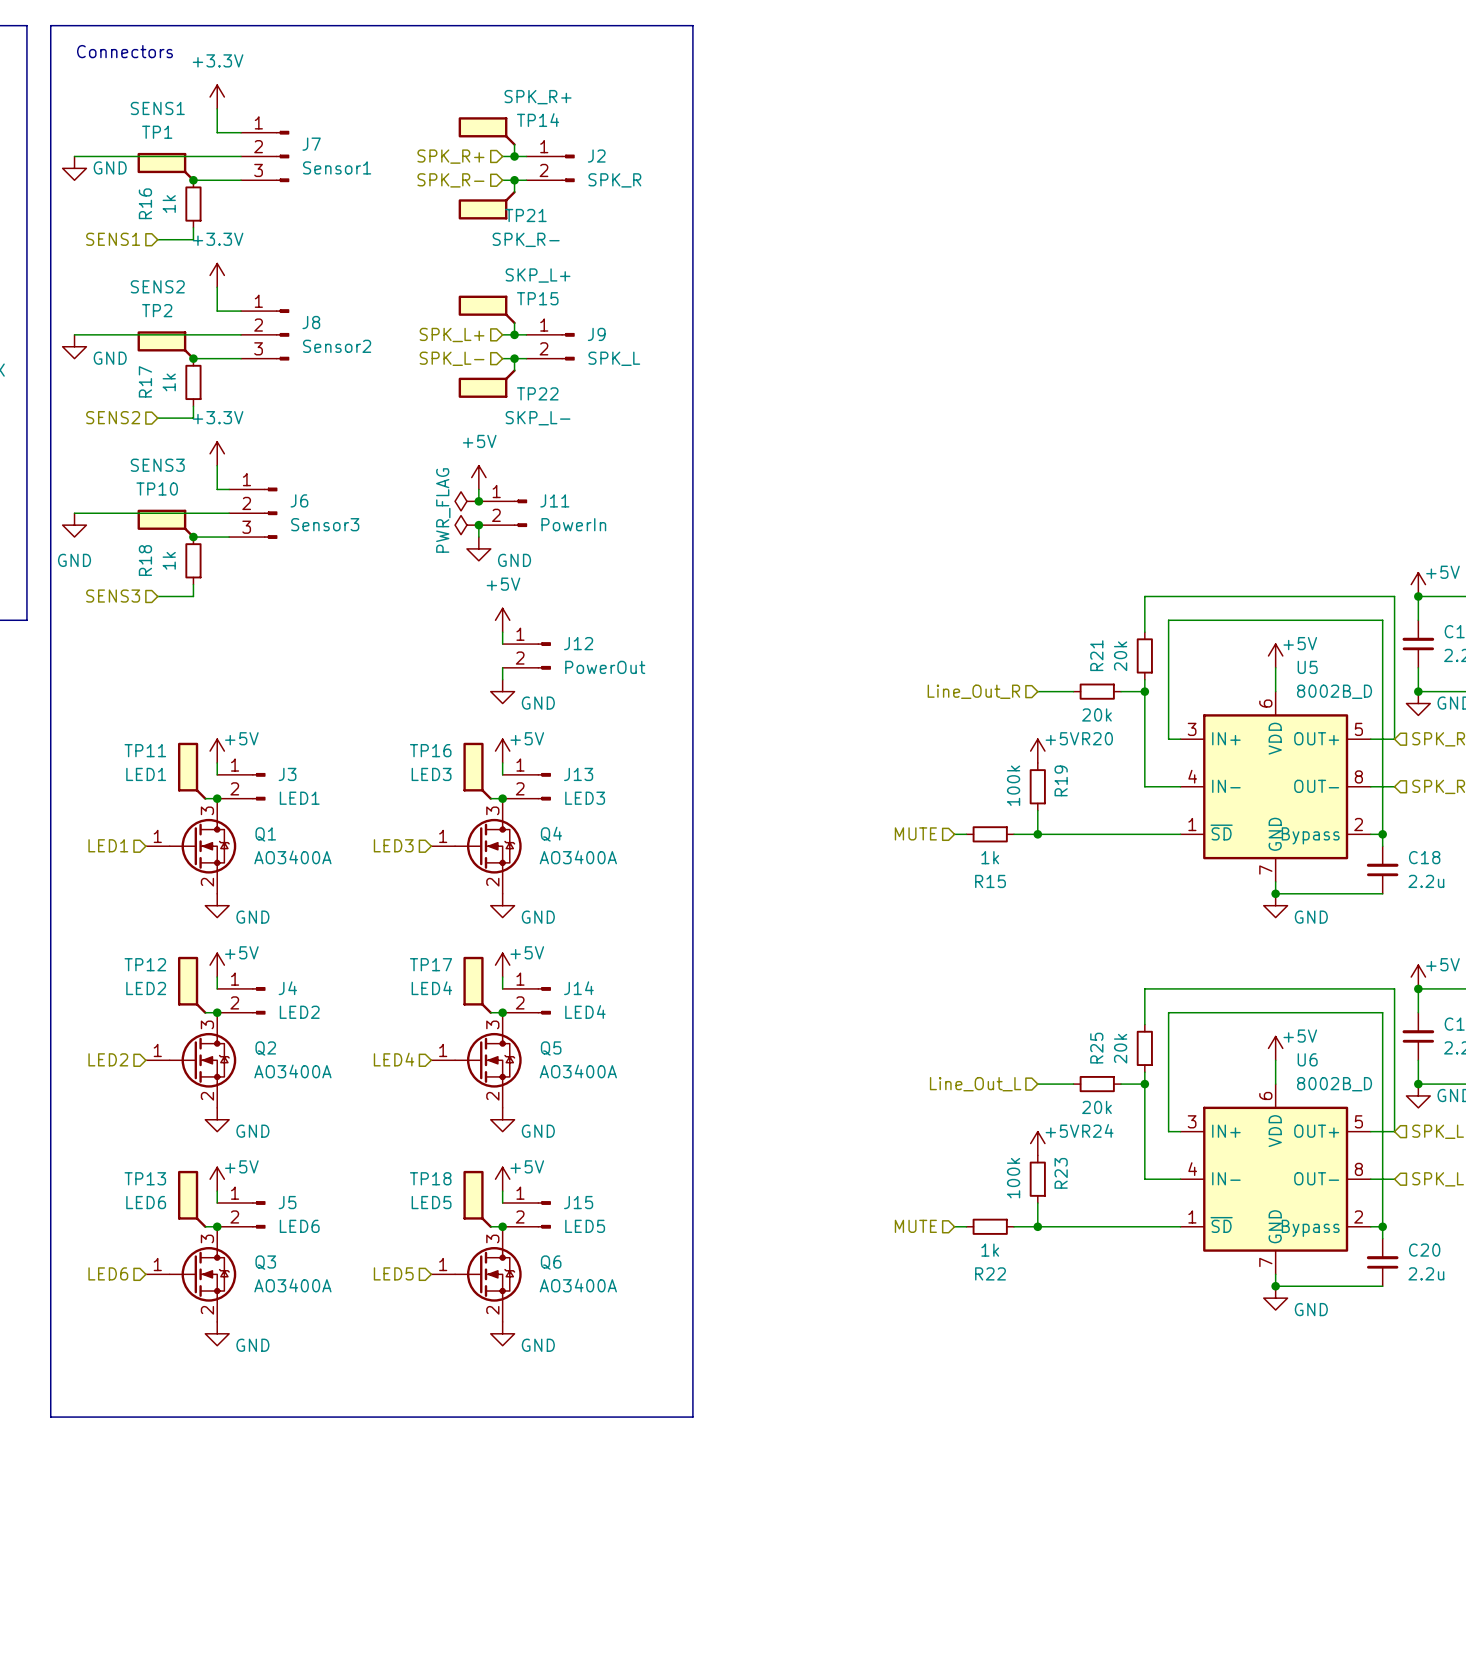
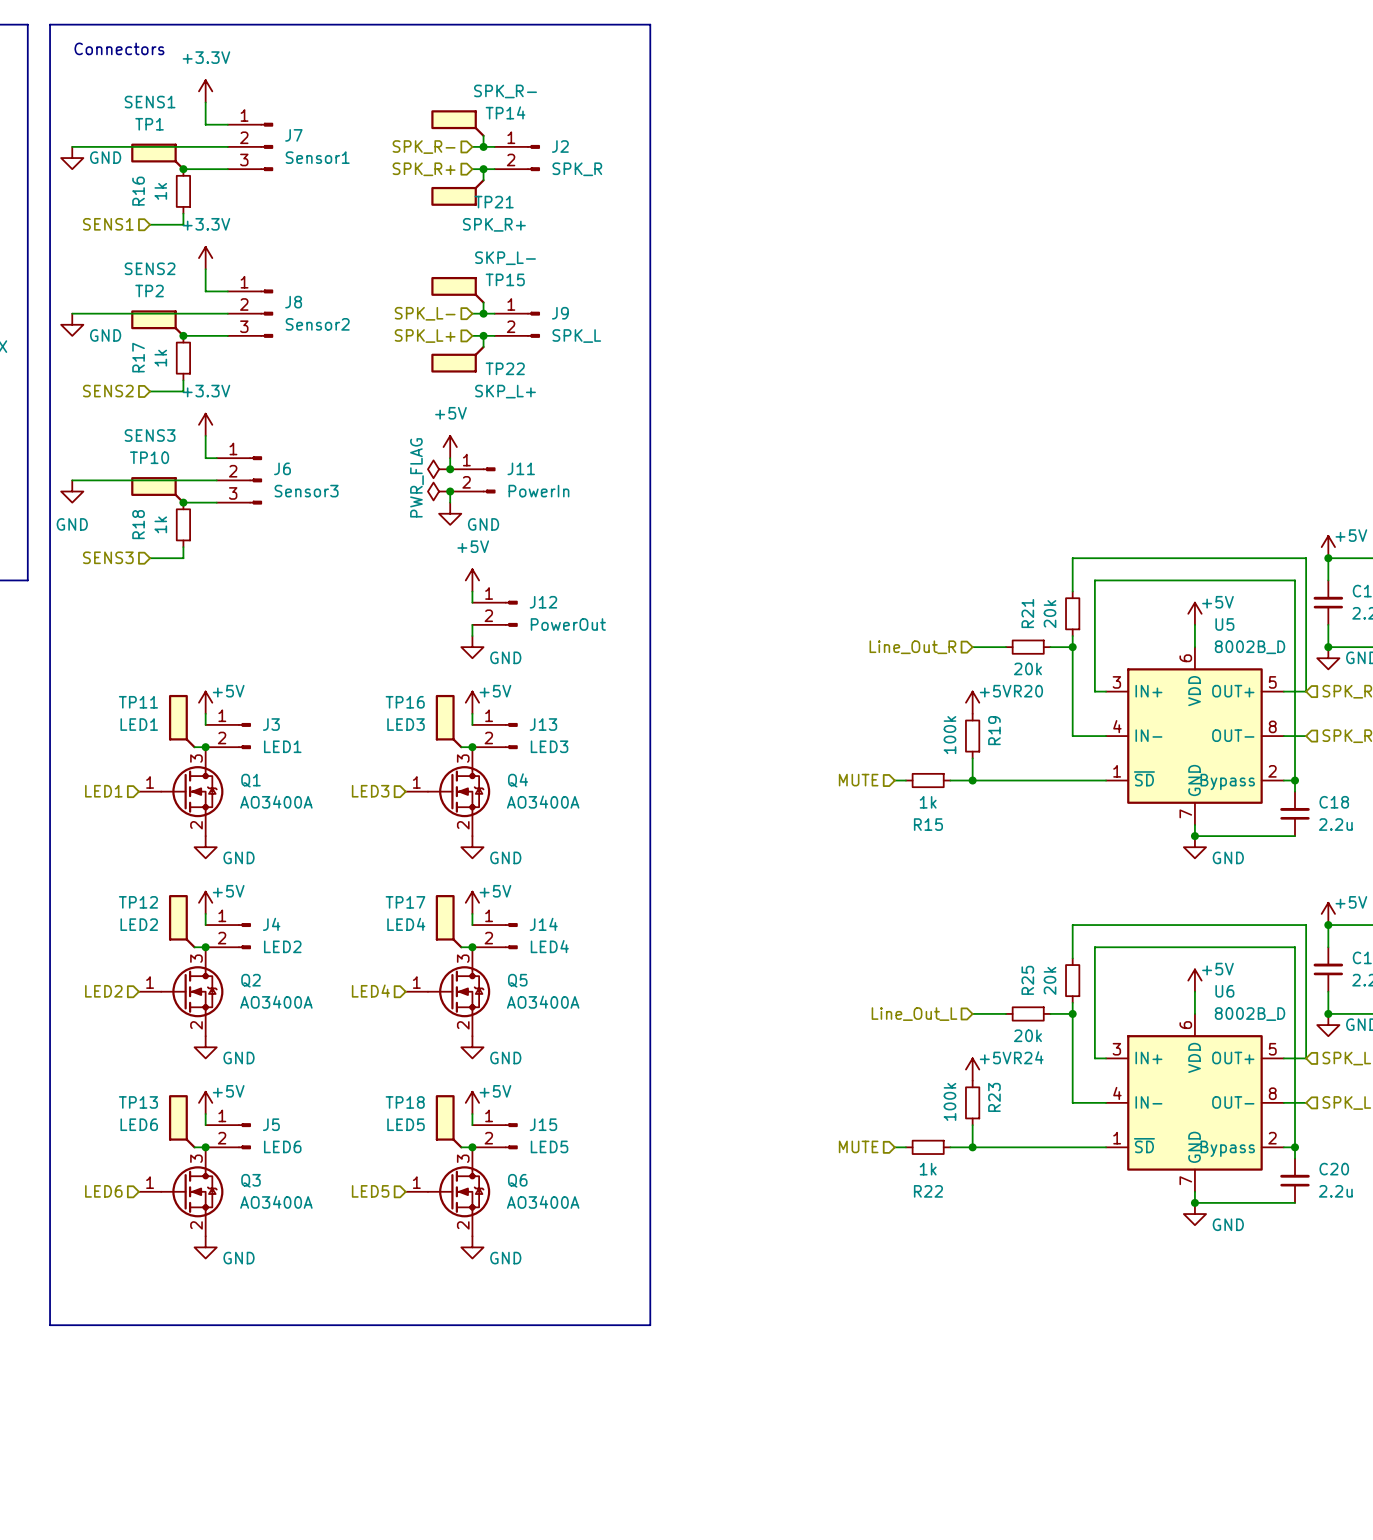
TP14 value: SPK_R+ (538, 97) -> SPK_R- (505, 91)
hierarchical label: SPK_R+ (450, 156) -> SPK_R- (424, 147)
hierarchical label: SPK_R- (450, 180) -> SPK_R+ (424, 169)
TP21 value: SPK_R- (526, 239) -> SPK_R+ (494, 224)
TP15 value: SKP_L+ (538, 275) -> SKP_L- (505, 258)
hierarchical label: SPK_L+ (452, 334) -> SPK_L- (425, 313)
hierarchical label: SPK_L- (452, 358) -> SPK_L+ (425, 336)
TP22 value: SKP_L- (538, 418) -> SKP_L+ (505, 391)

